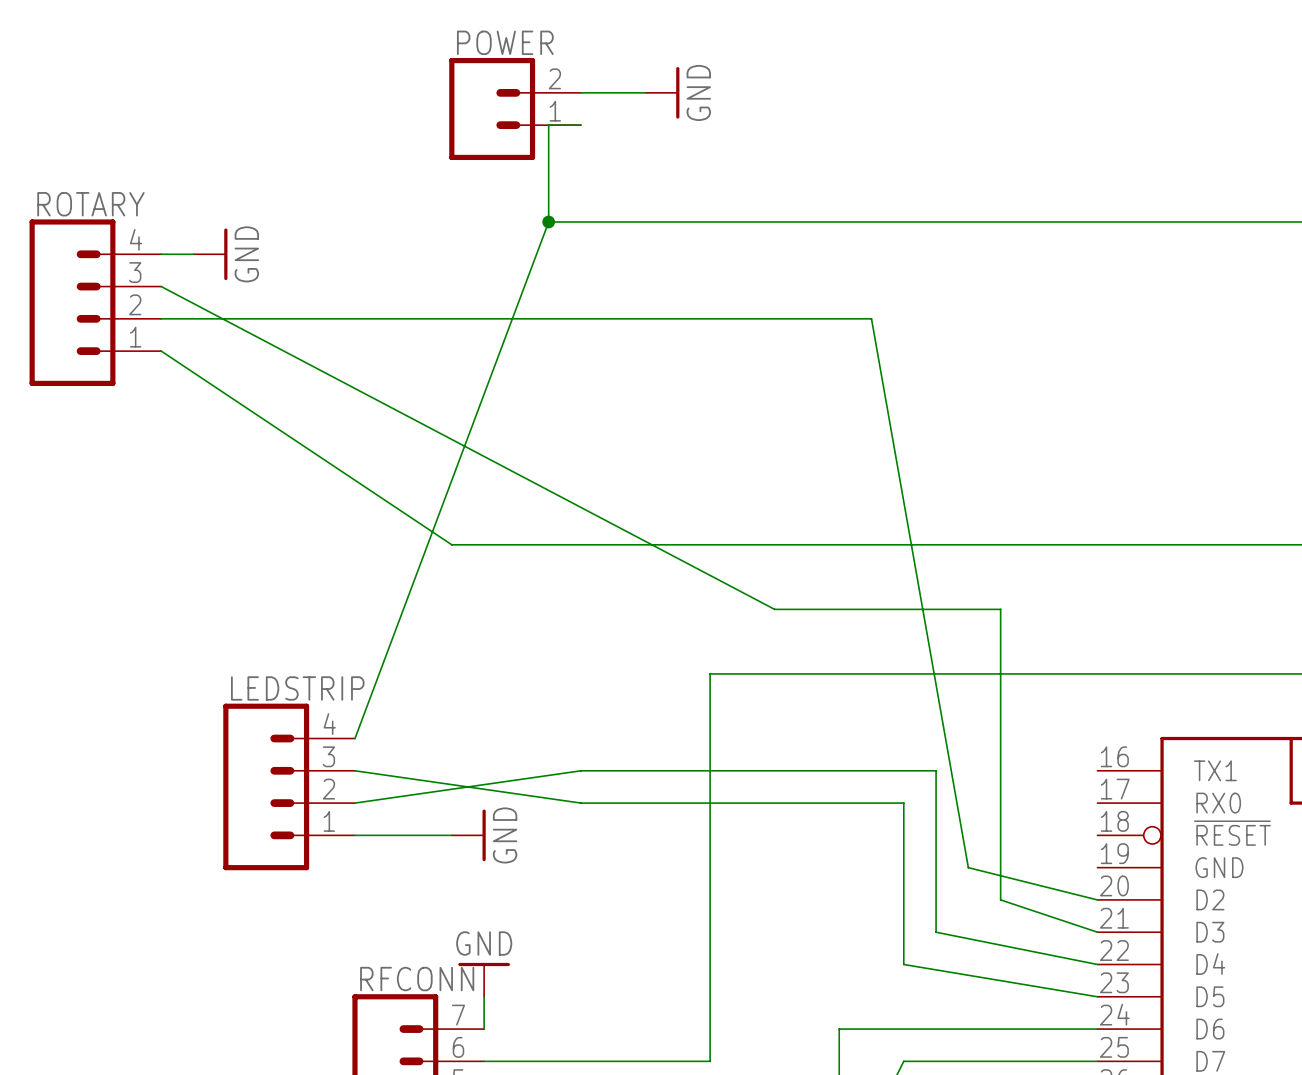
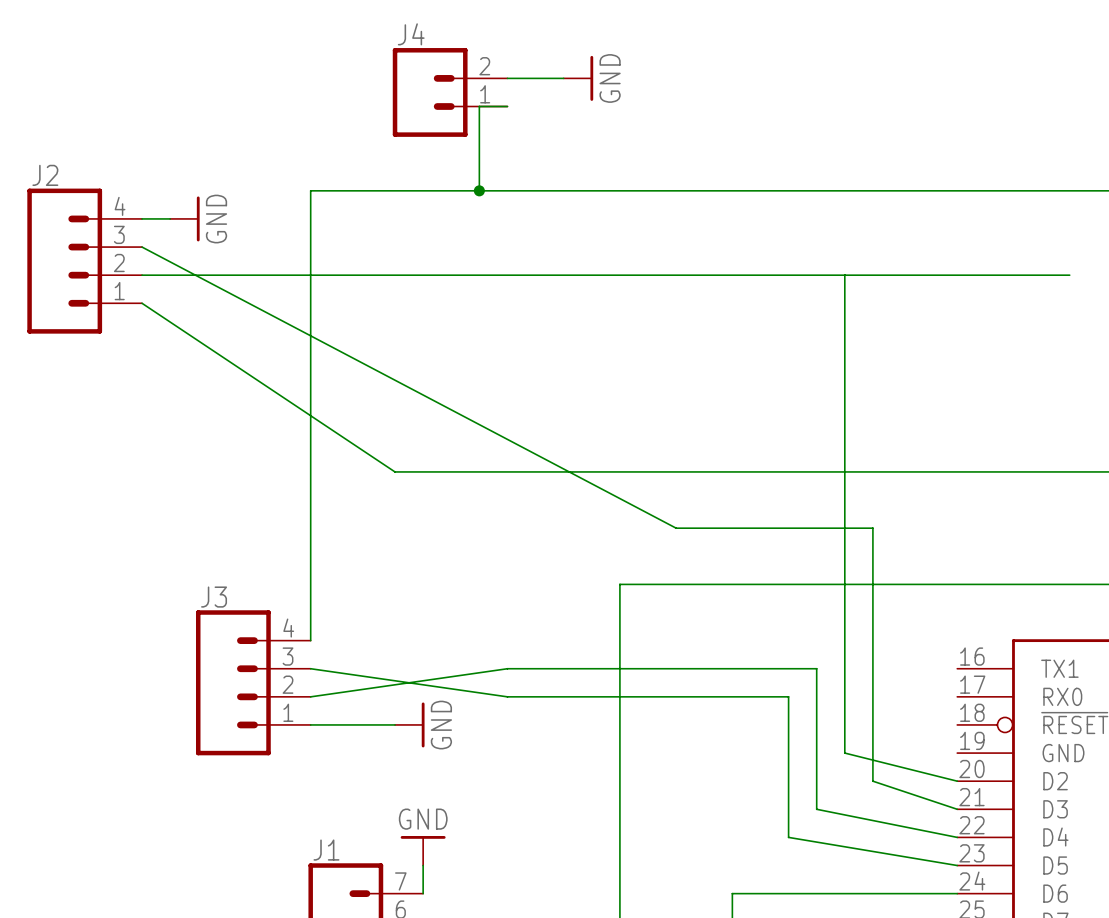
POWER name: POWER (505, 42) -> J4 (411, 34)
ROTARY name: ROTARY (90, 204) -> J2 (45, 175)
wire: (548, 221) (354, 738) -> (479, 190) (310, 190) (310, 640)
wire: (871, 318) (968, 867) -> (844, 275) (844, 753)
wire: none -> (760, 275) (1069, 275)
LEDSTRIP name: LEDSTRIP (297, 688) -> J3 (214, 597)
RFCONN name: RFCONN (417, 979) -> J1 (326, 850)

